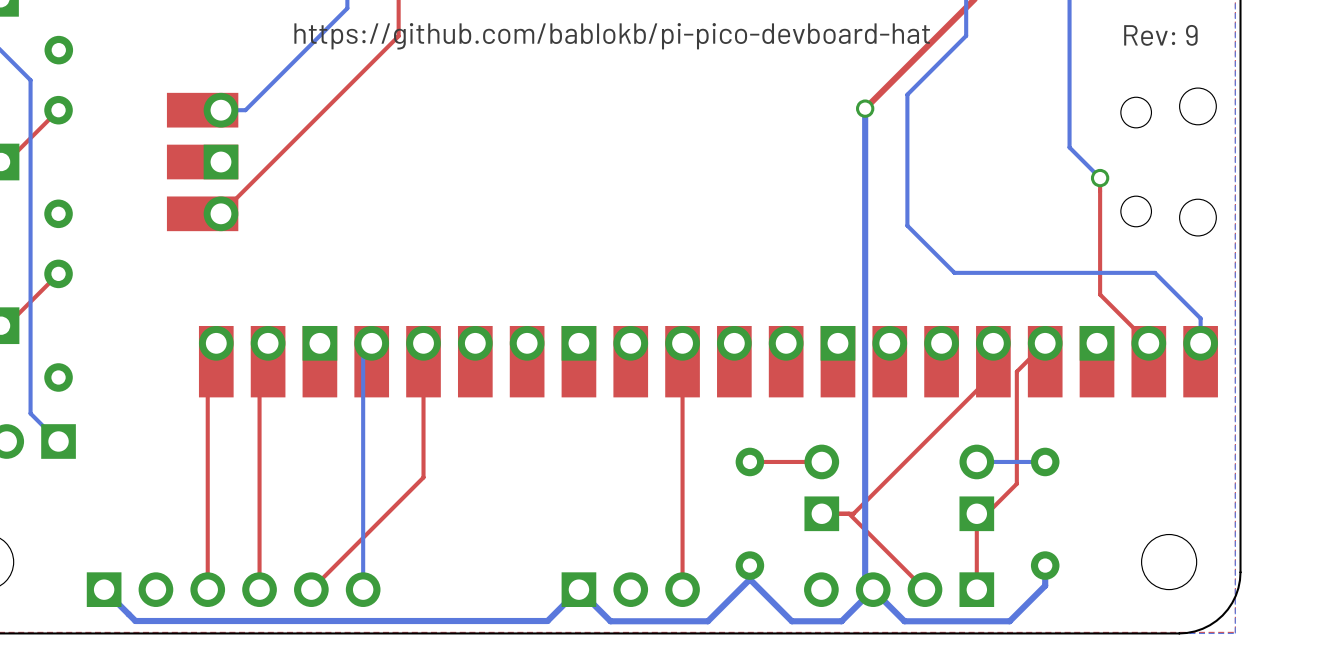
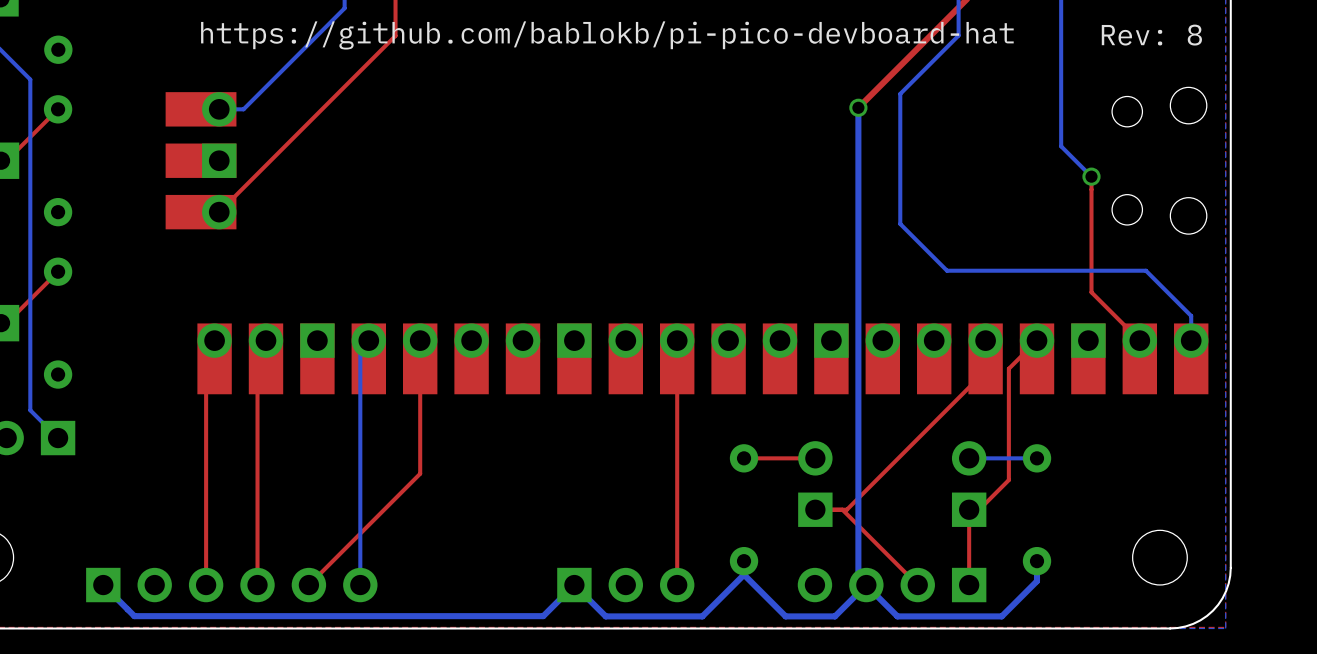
text: Rev: 9 (1160, 35) -> Rev: 8 (1151, 35)

